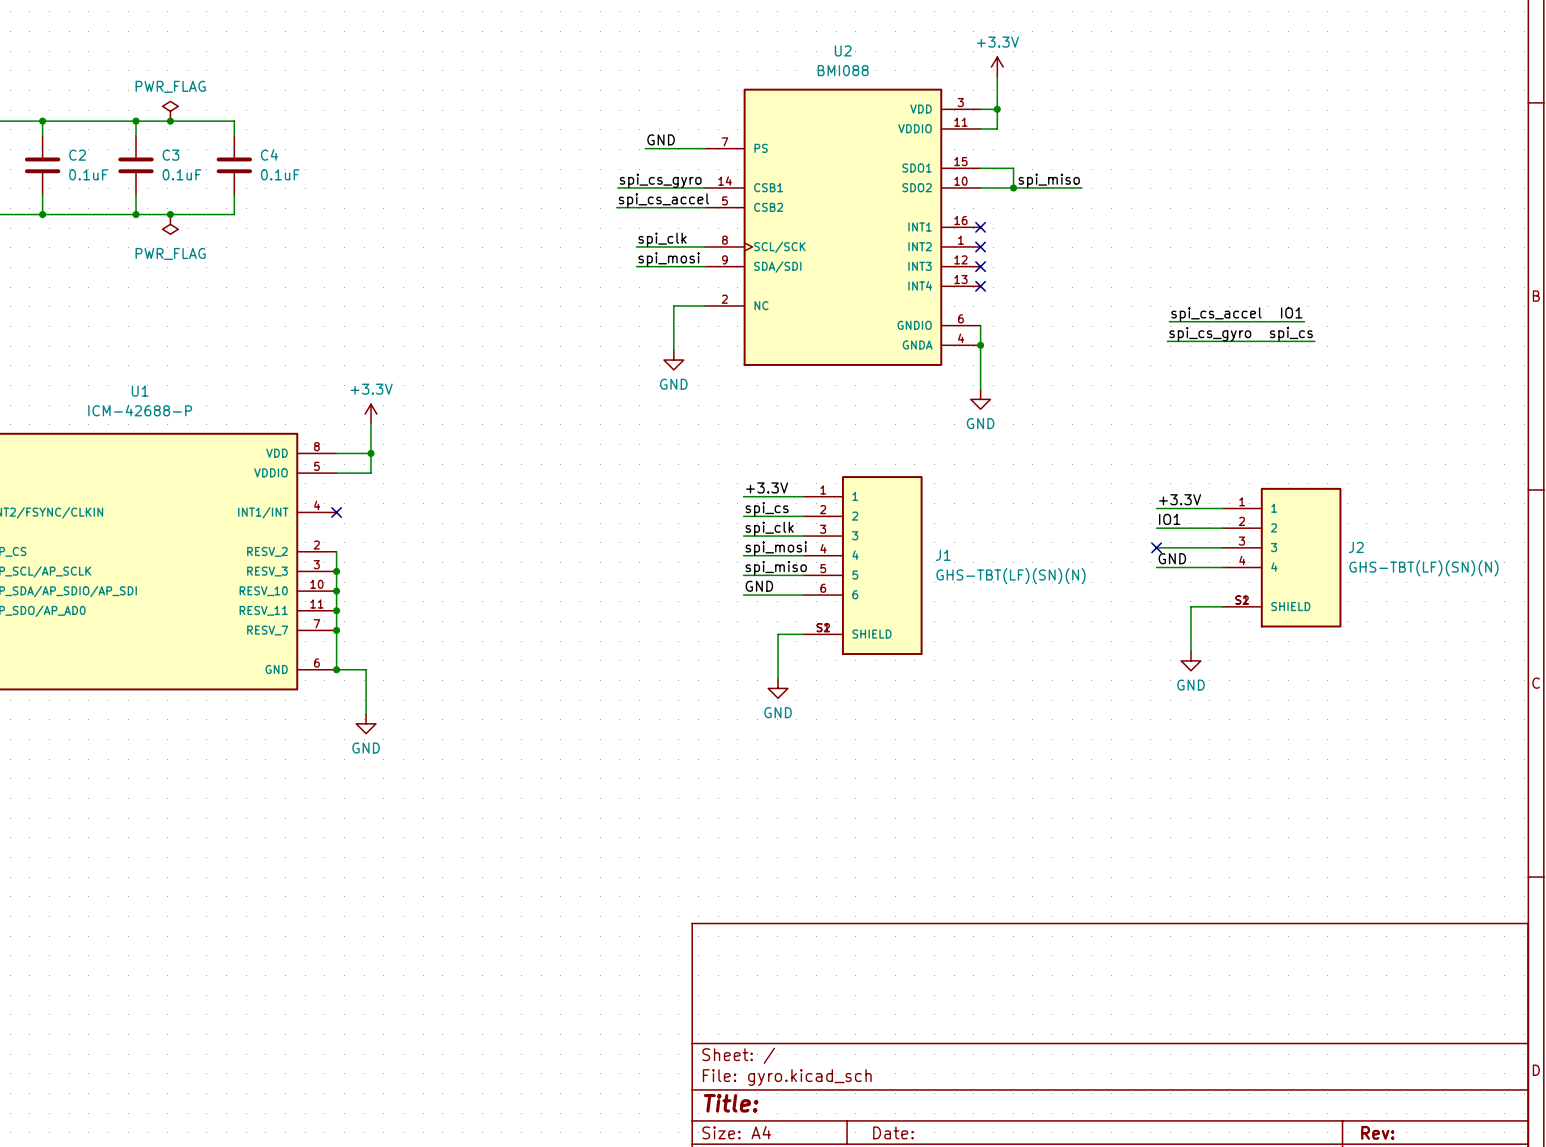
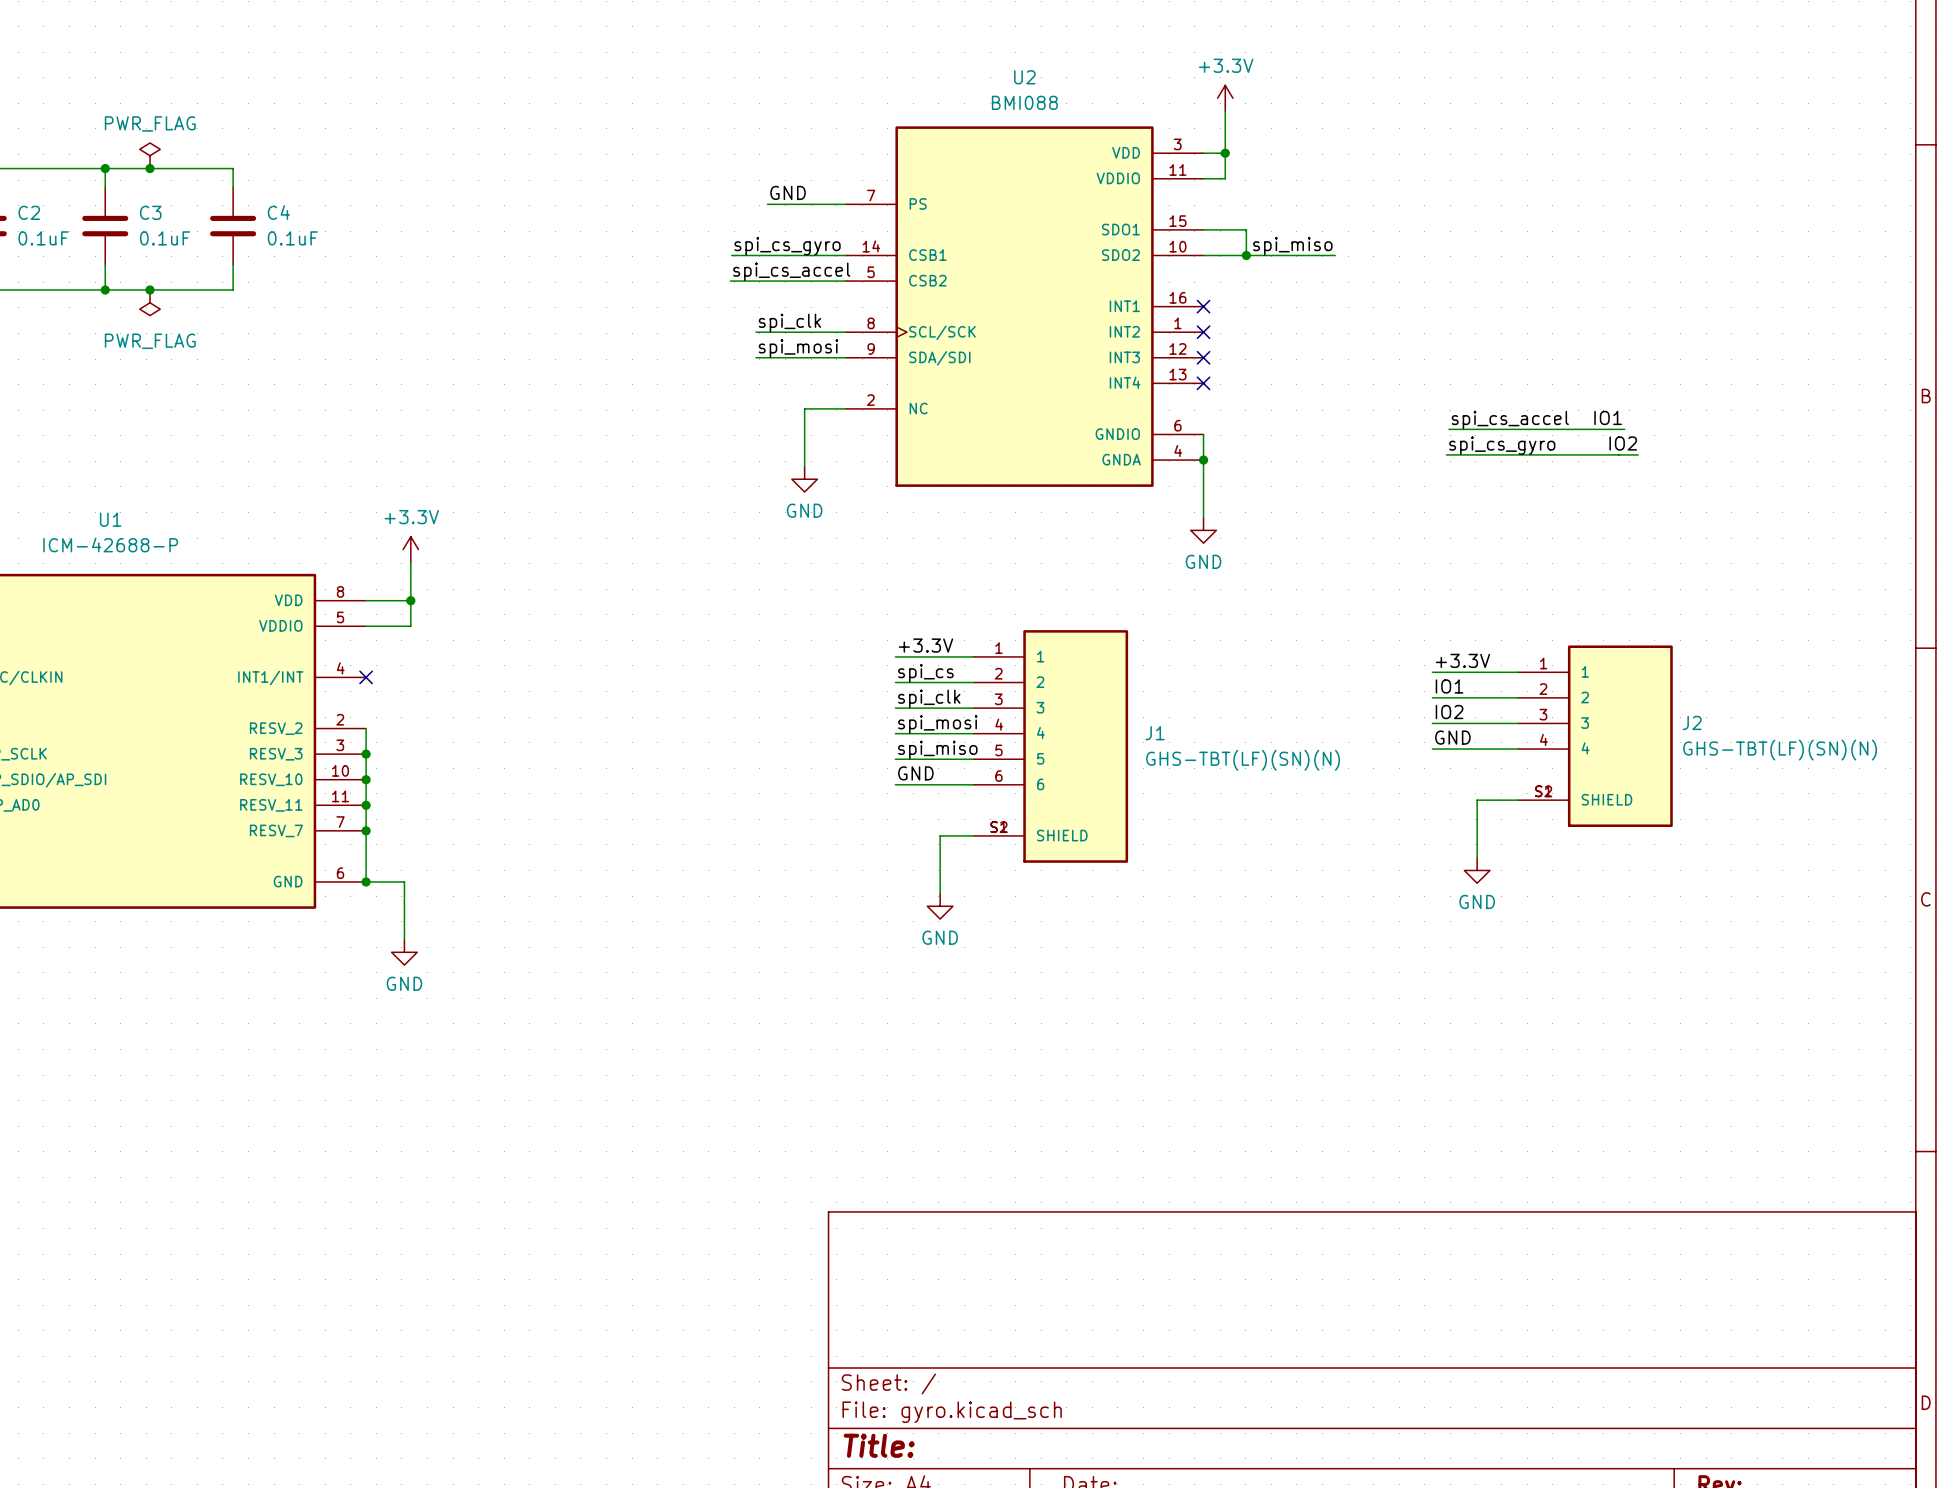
label: spi_cs (1291, 334) -> IO2 (1623, 443)
label: none -> IO2 (1449, 712)
no-connect mark: (1156, 547) -> none

